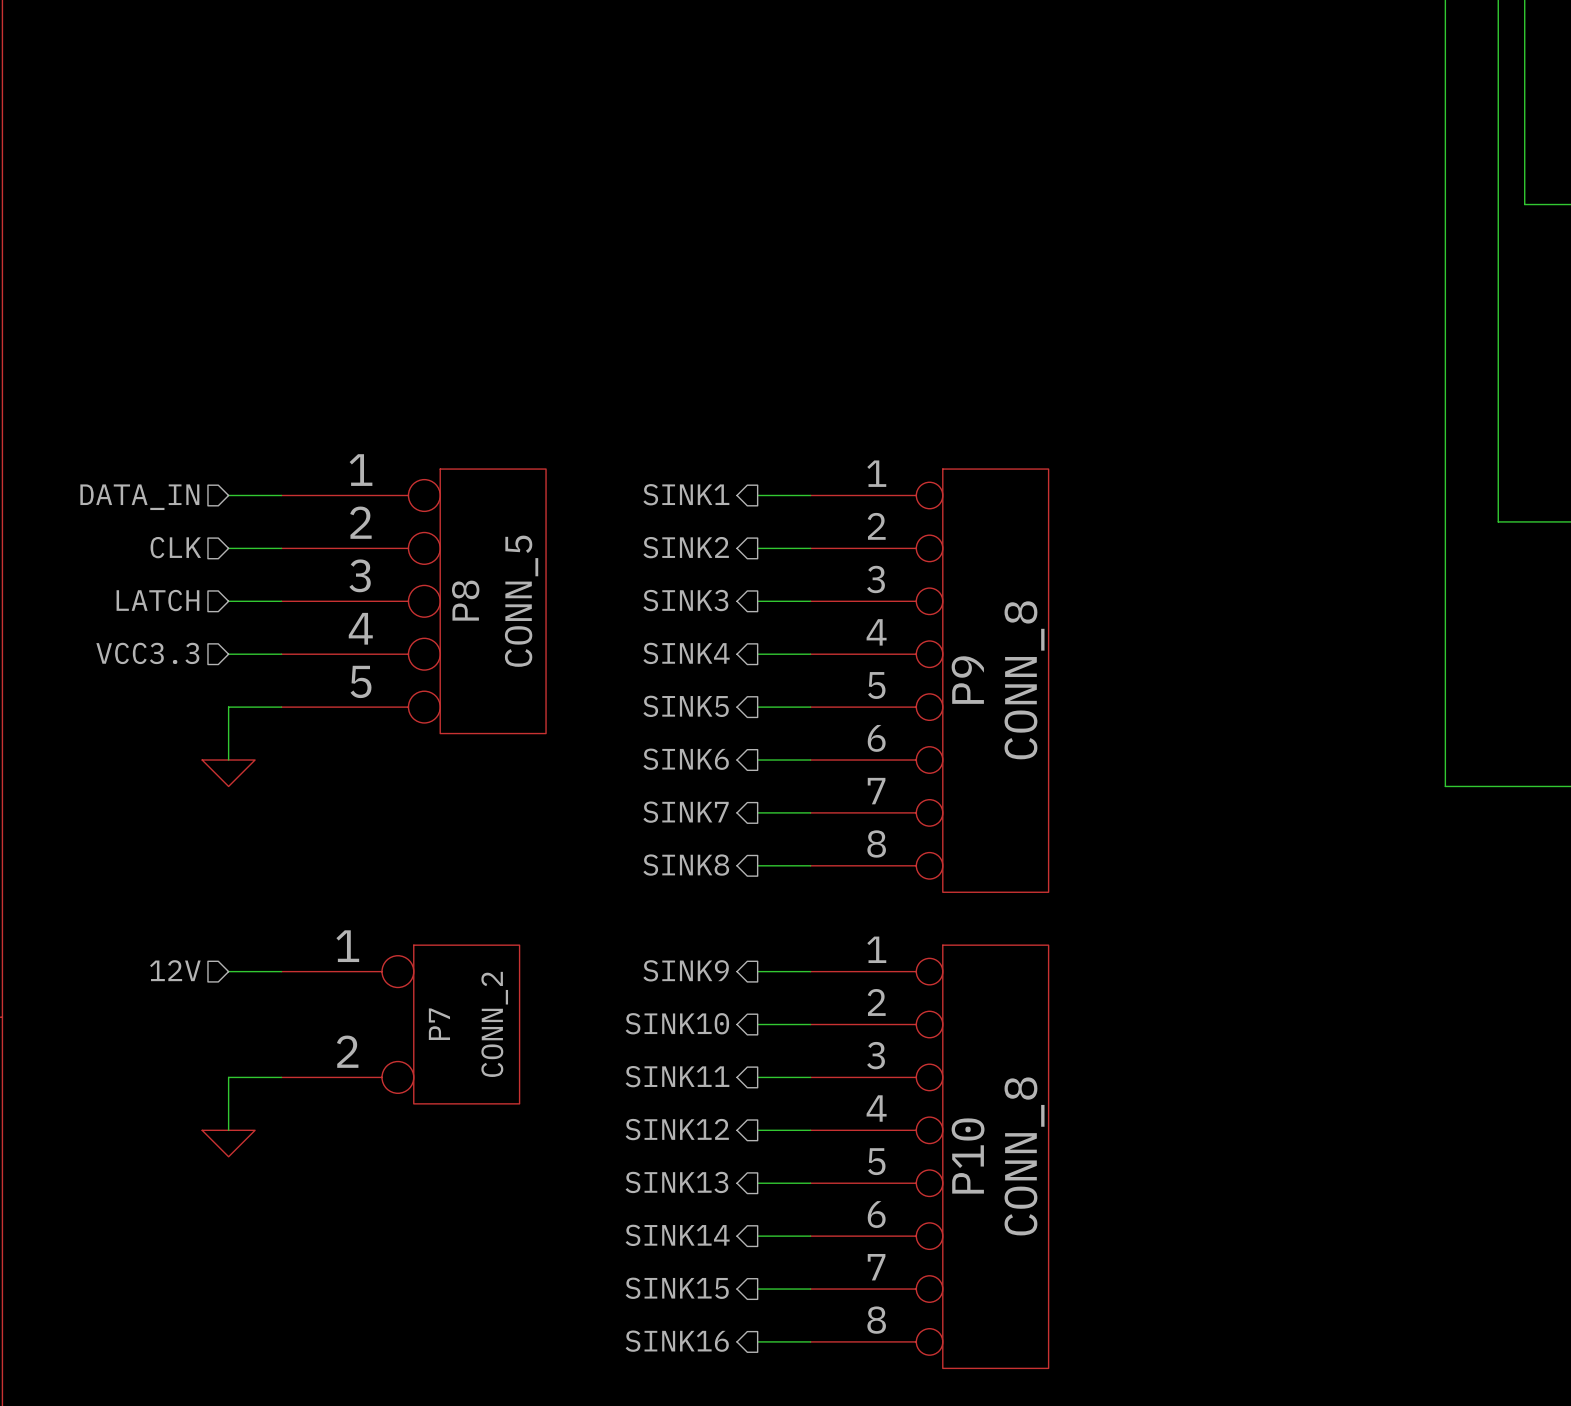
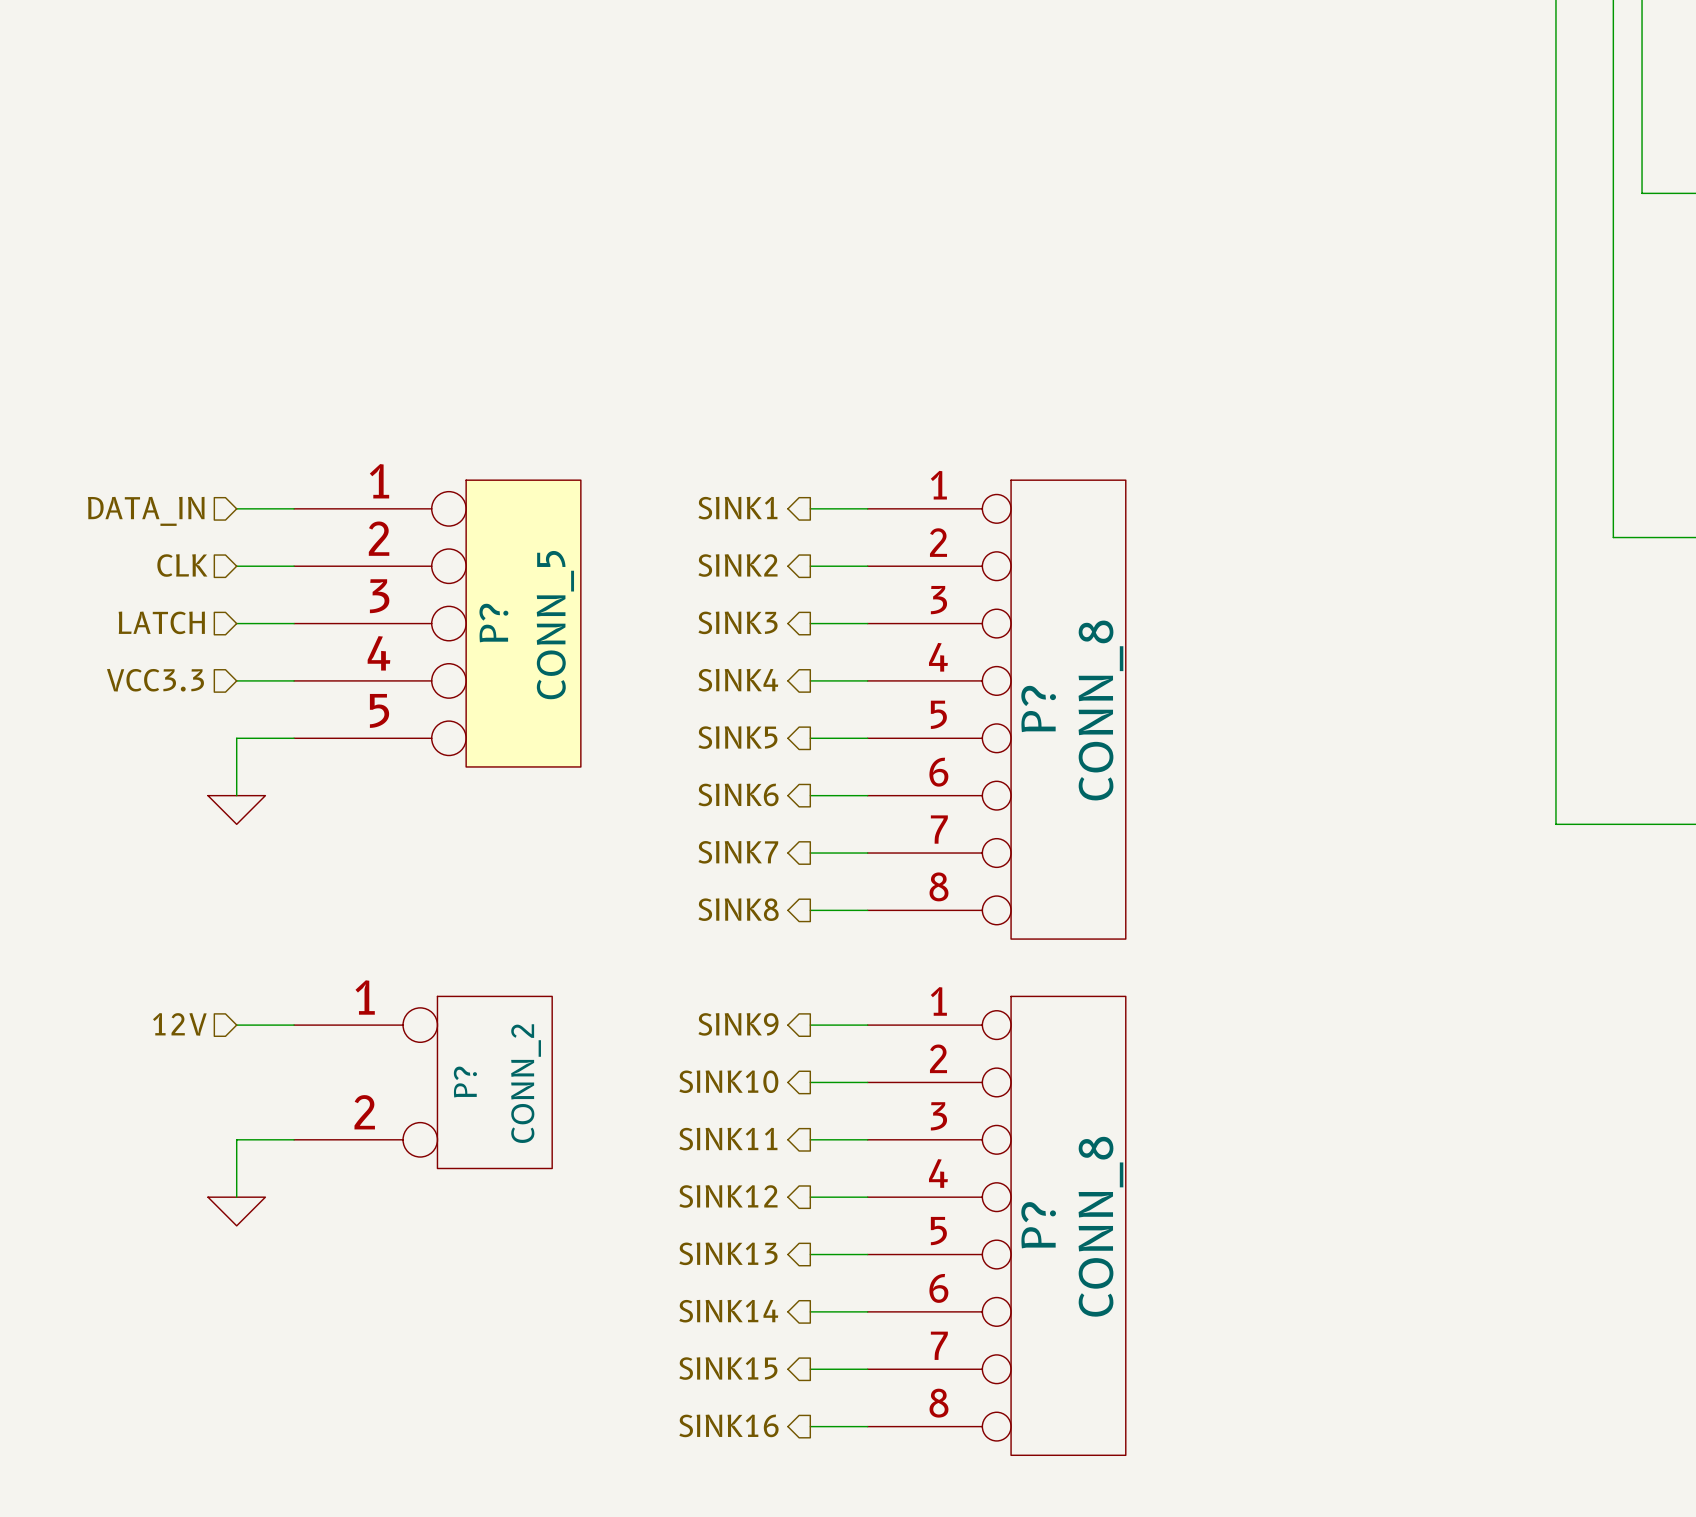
P8 name: P8 (465, 600) -> P? (493, 623)
P9 name: P9 (967, 680) -> P? (1038, 708)
P7 name: P7 (439, 1024) -> P? (465, 1082)
P10 name: P10 (968, 1156) -> P? (1038, 1225)

